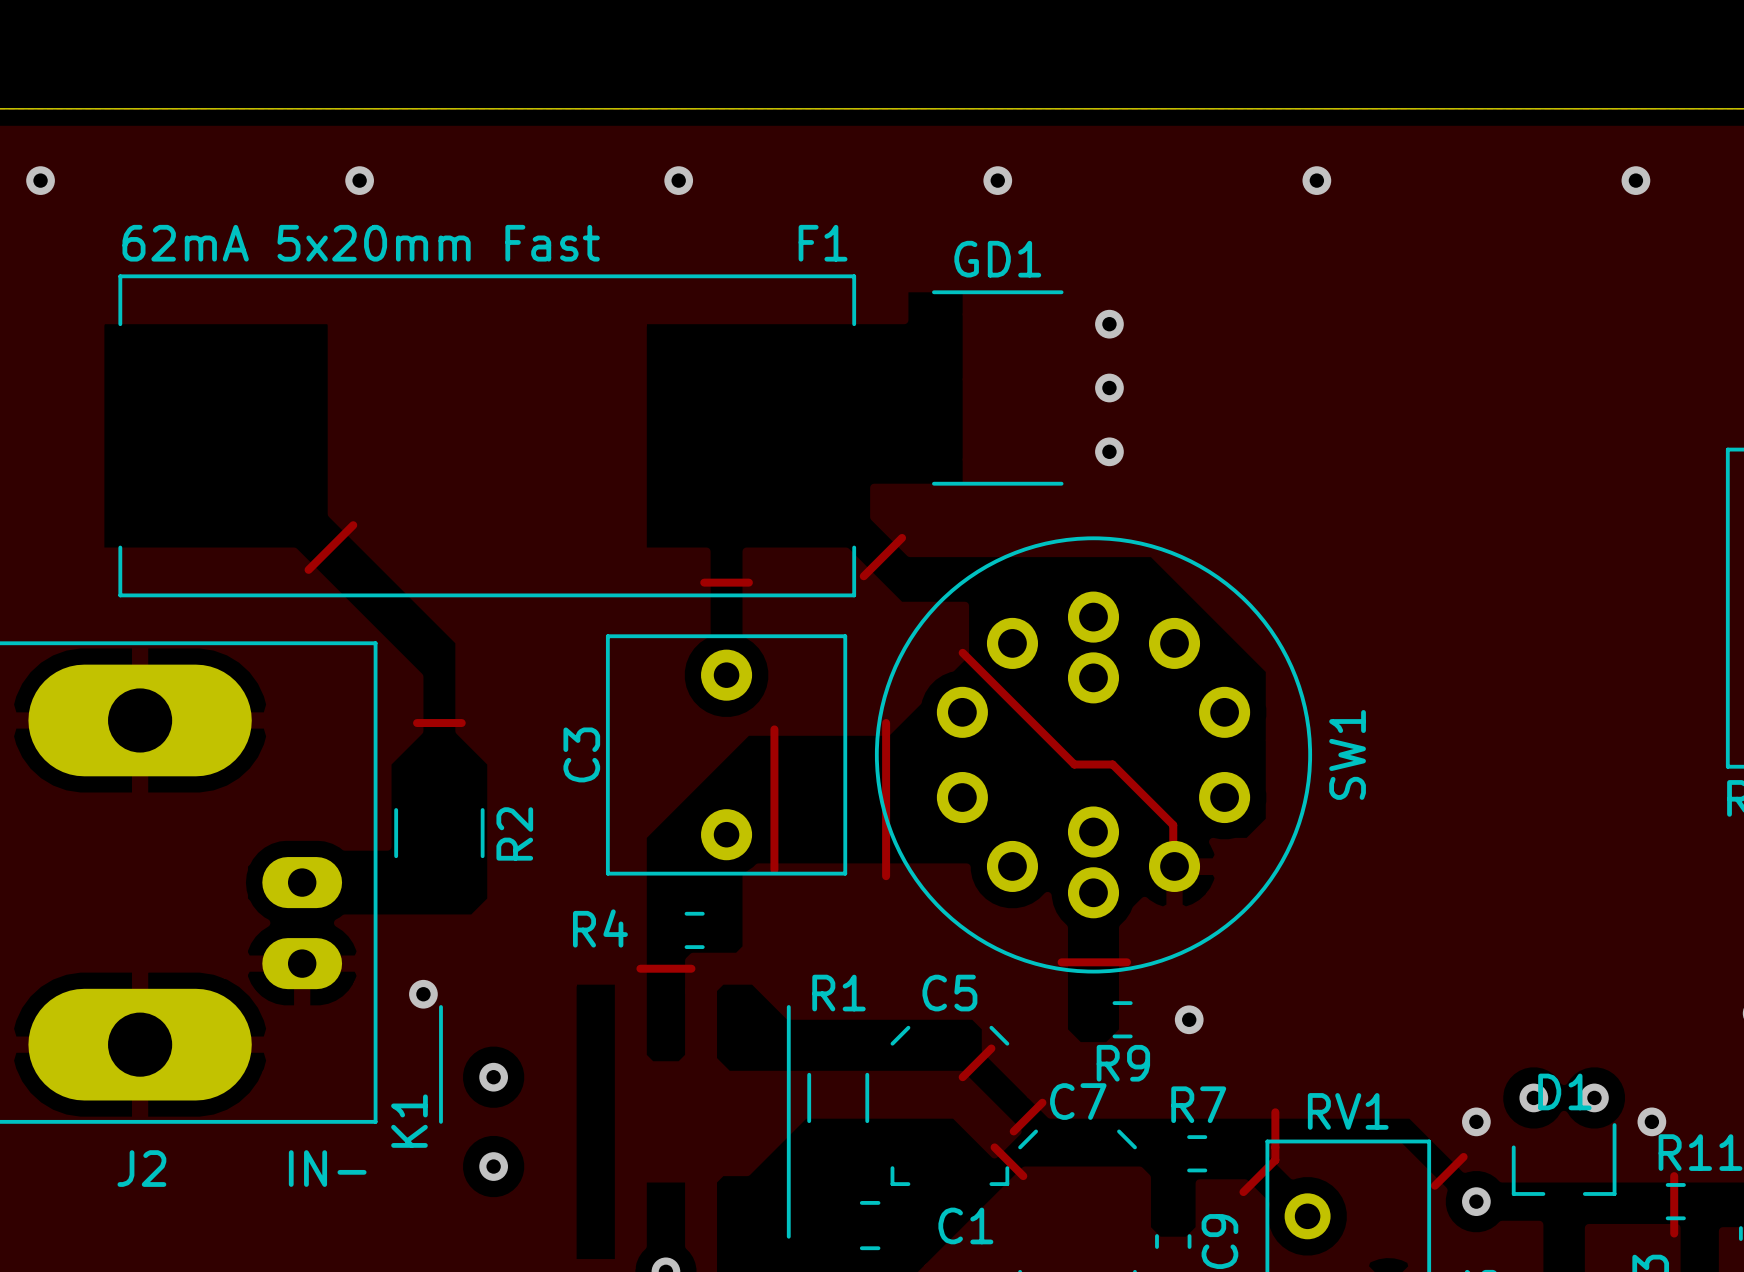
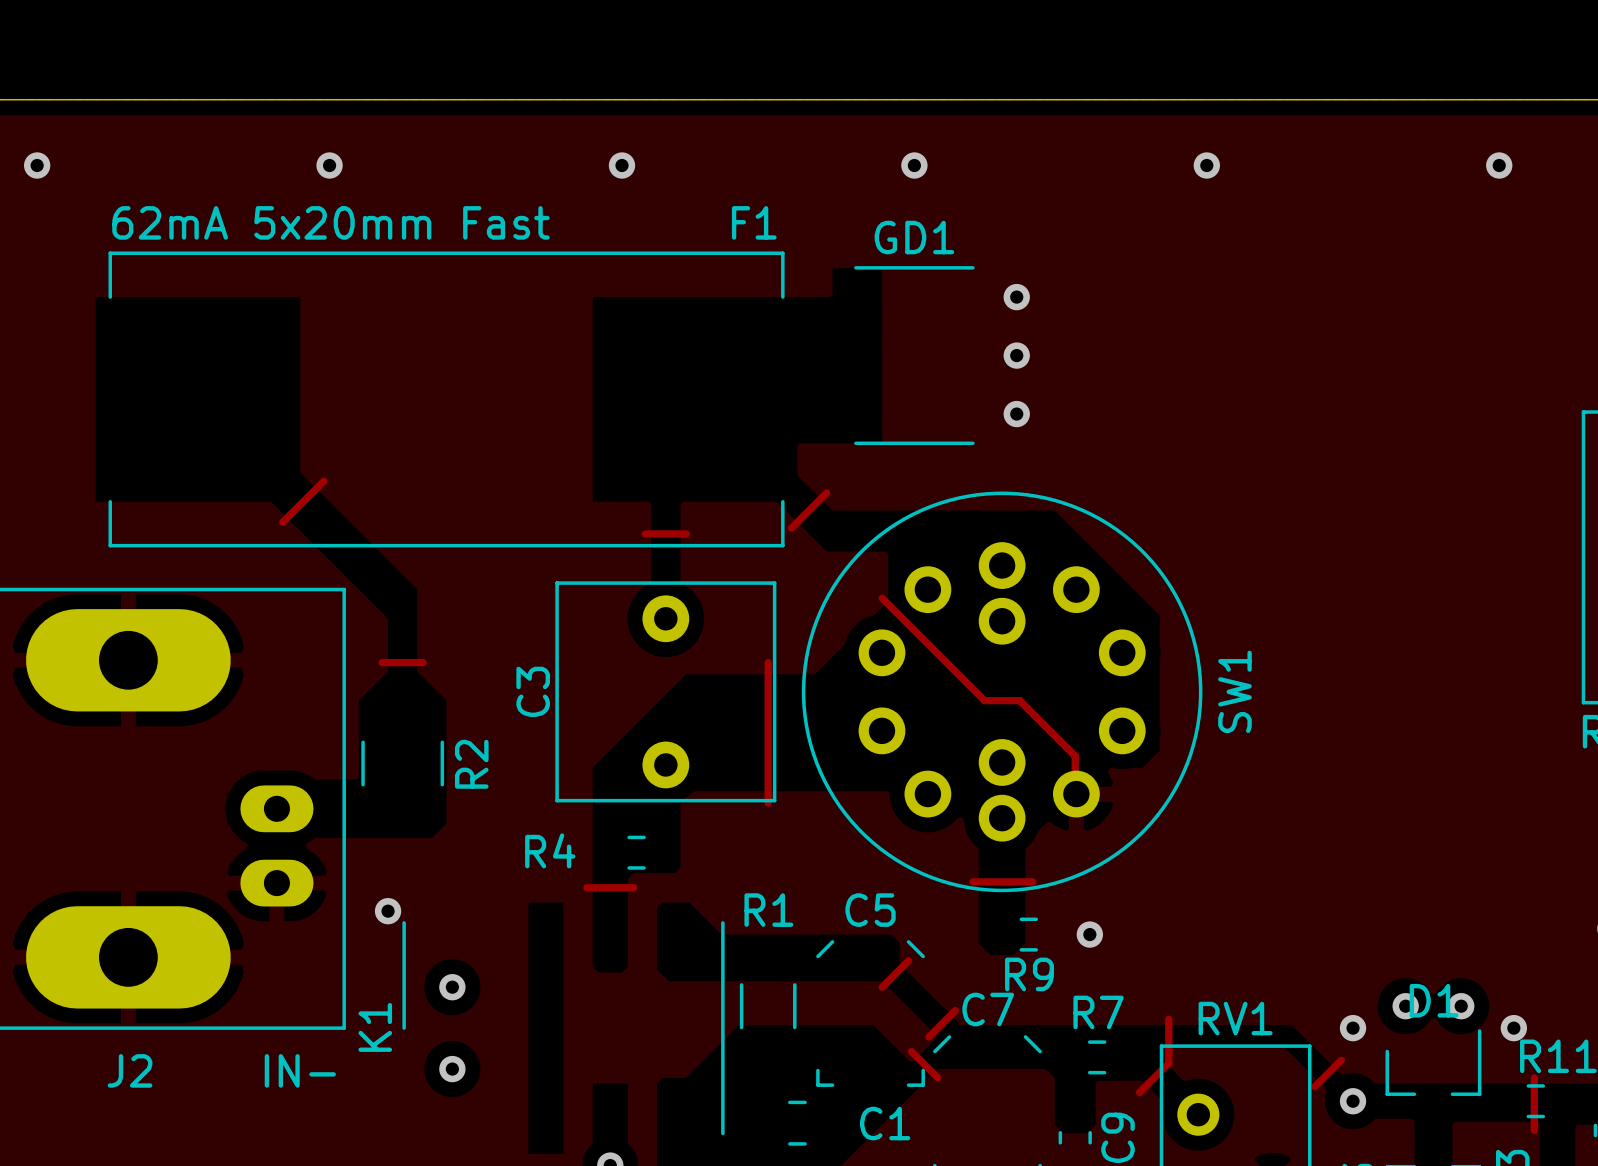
track: (886, 723) (886, 876) -> (768, 662) (768, 802)
track: (774, 729) (774, 869) -> none

